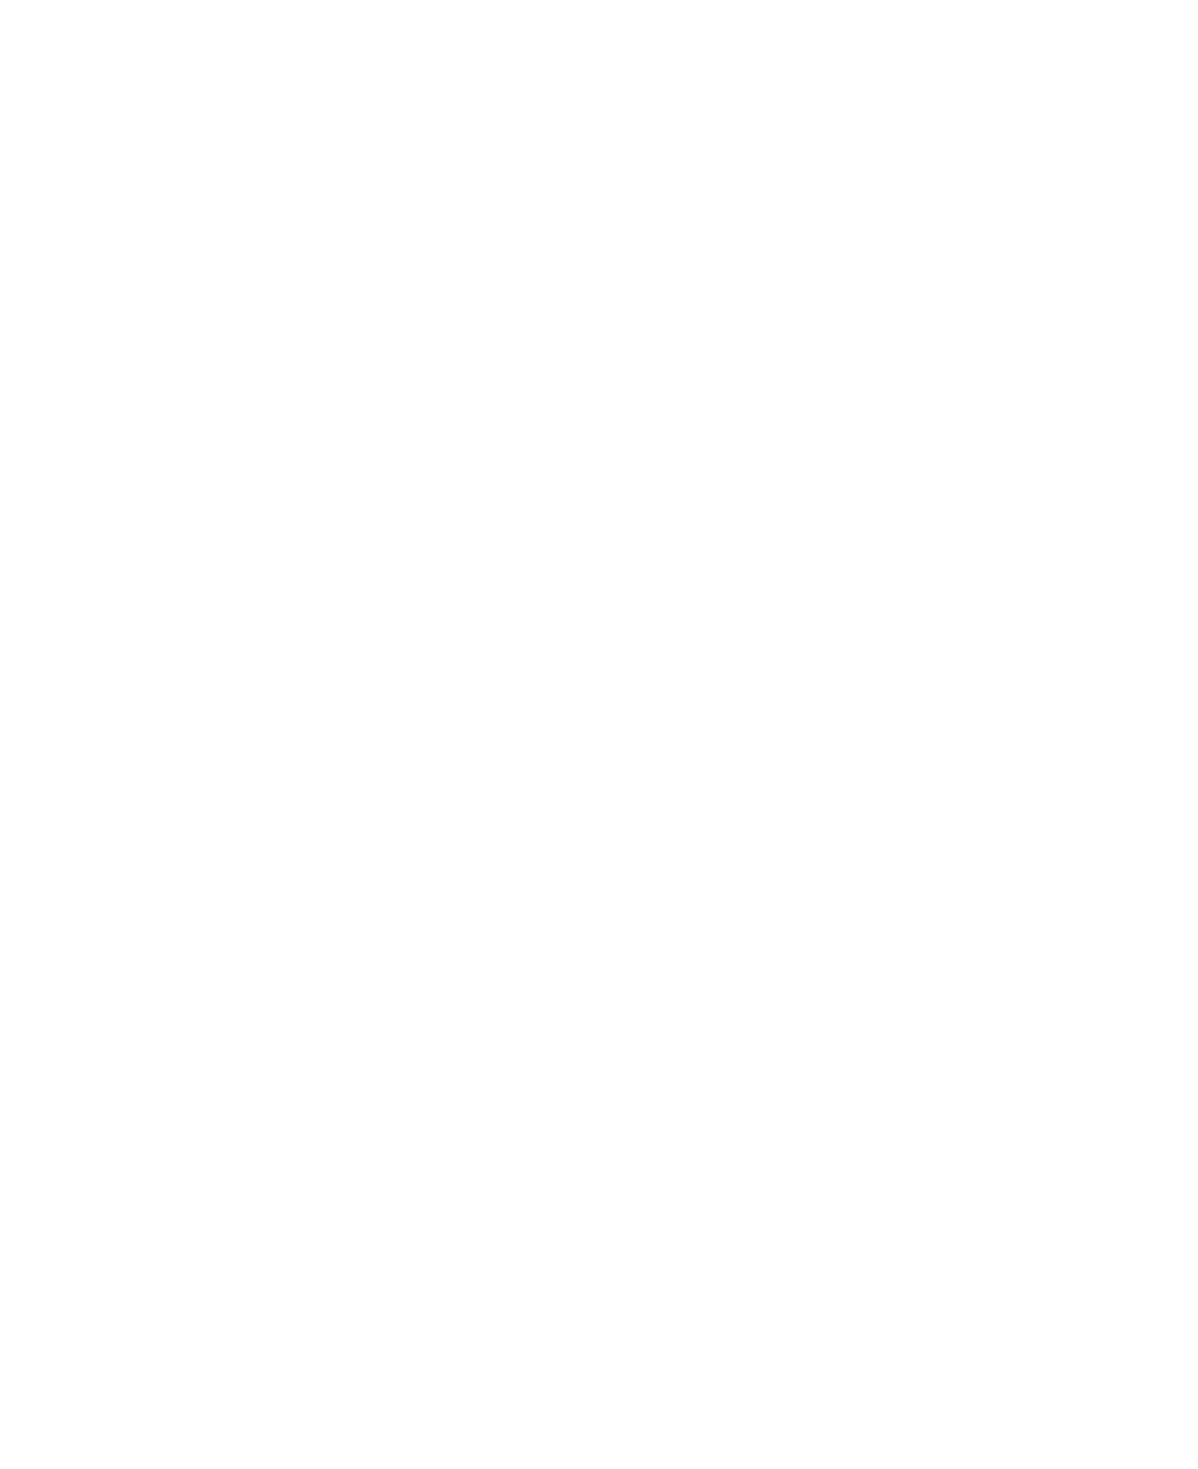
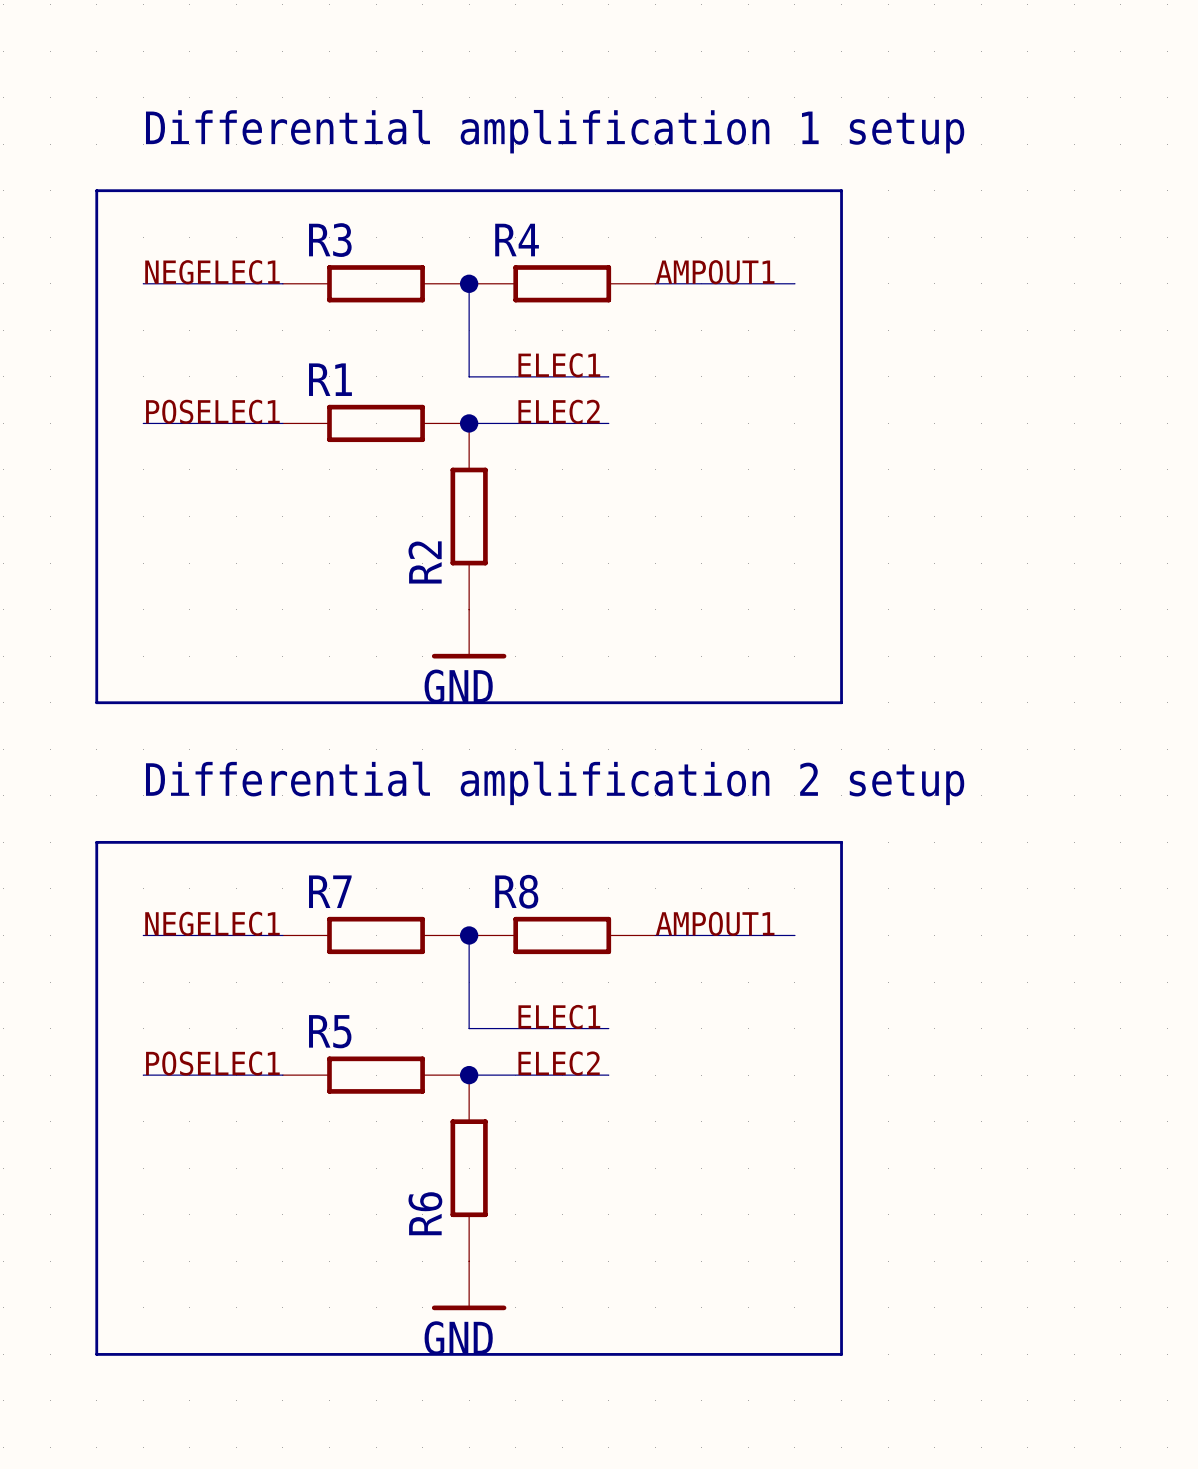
text: none -> Differential amplification 1 setup (555, 131)
line: none -> (96, 190) (96, 702) (841, 702) (841, 190) (96, 190)
label: none -> NEGELEC1 (212, 272)
label: none -> AMPOUT1 (715, 272)
wire: none -> (143, 283) (282, 283)
R3: none -> (376, 283)
wire: none -> (469, 283) (469, 376) (608, 376)
junction: none -> (469, 283)
R4: none -> (562, 283)
wire: none -> (655, 283) (794, 283)
label: none -> ELEC1 (559, 365)
label: none -> POSELEC1 (212, 411)
label: none -> ELEC2 (559, 411)
wire: none -> (143, 423) (282, 423)
R1: none -> (376, 423)
wire: none -> (469, 423) (608, 423)
junction: none -> (469, 423)
R2: none -> (469, 516)
power symbol: none -> GND (469, 634)
text: none -> Differential amplification 2 setup (555, 783)
line: none -> (96, 842) (96, 1354) (841, 1354) (841, 842) (96, 842)
label: none -> NEGELEC1 (212, 923)
label: none -> AMPOUT1 (715, 923)
wire: none -> (143, 935) (282, 935)
R7: none -> (376, 935)
wire: none -> (469, 935) (469, 1028) (608, 1028)
junction: none -> (469, 935)
R8: none -> (562, 935)
wire: none -> (655, 935) (794, 935)
label: none -> ELEC1 (559, 1016)
label: none -> POSELEC1 (212, 1063)
label: none -> ELEC2 (559, 1063)
wire: none -> (143, 1075) (282, 1075)
R5: none -> (376, 1075)
wire: none -> (469, 1075) (608, 1075)
junction: none -> (469, 1075)
R6: none -> (469, 1168)
power symbol: none -> GND (469, 1285)

